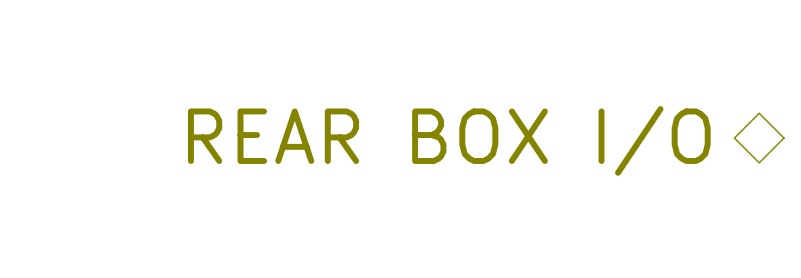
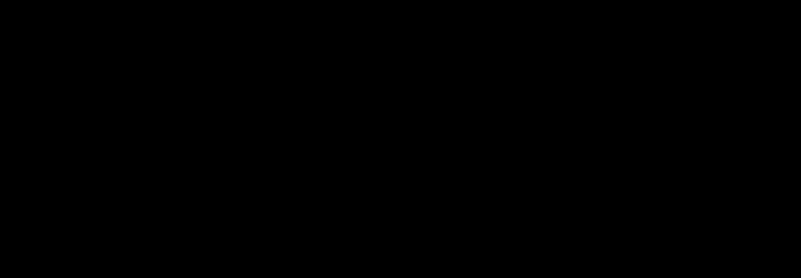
hierarchical label: REAR BOX I/O (449, 140) -> none

